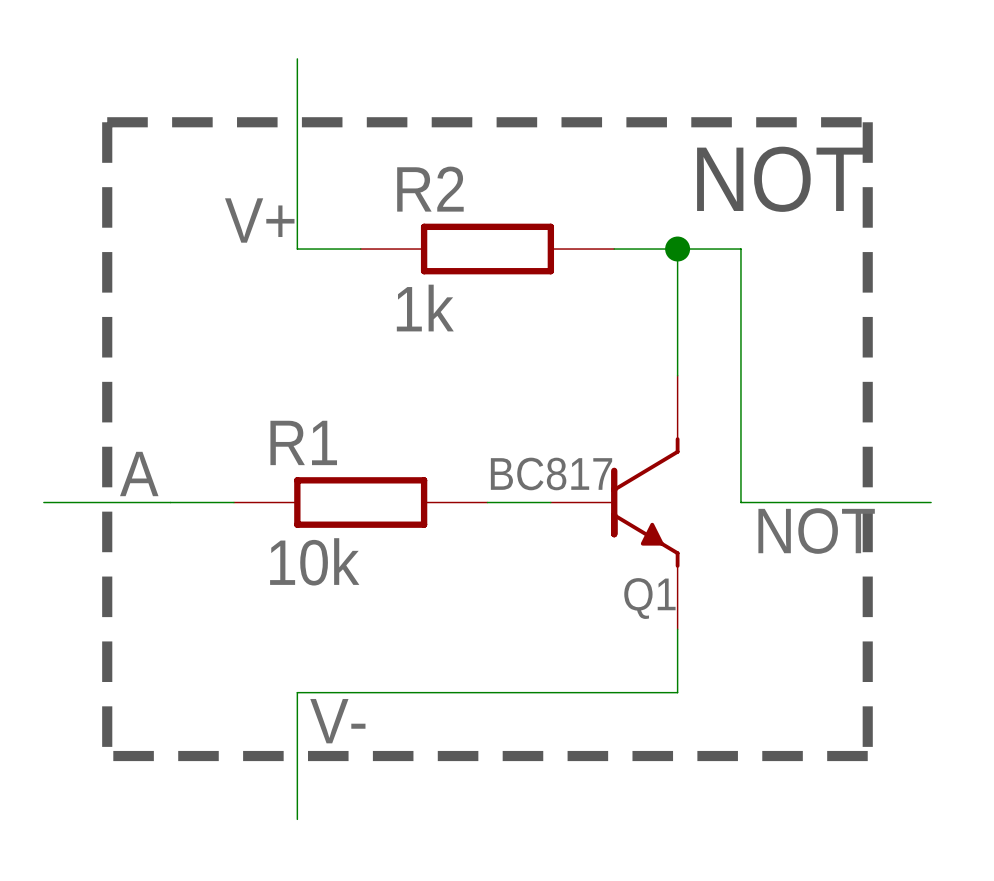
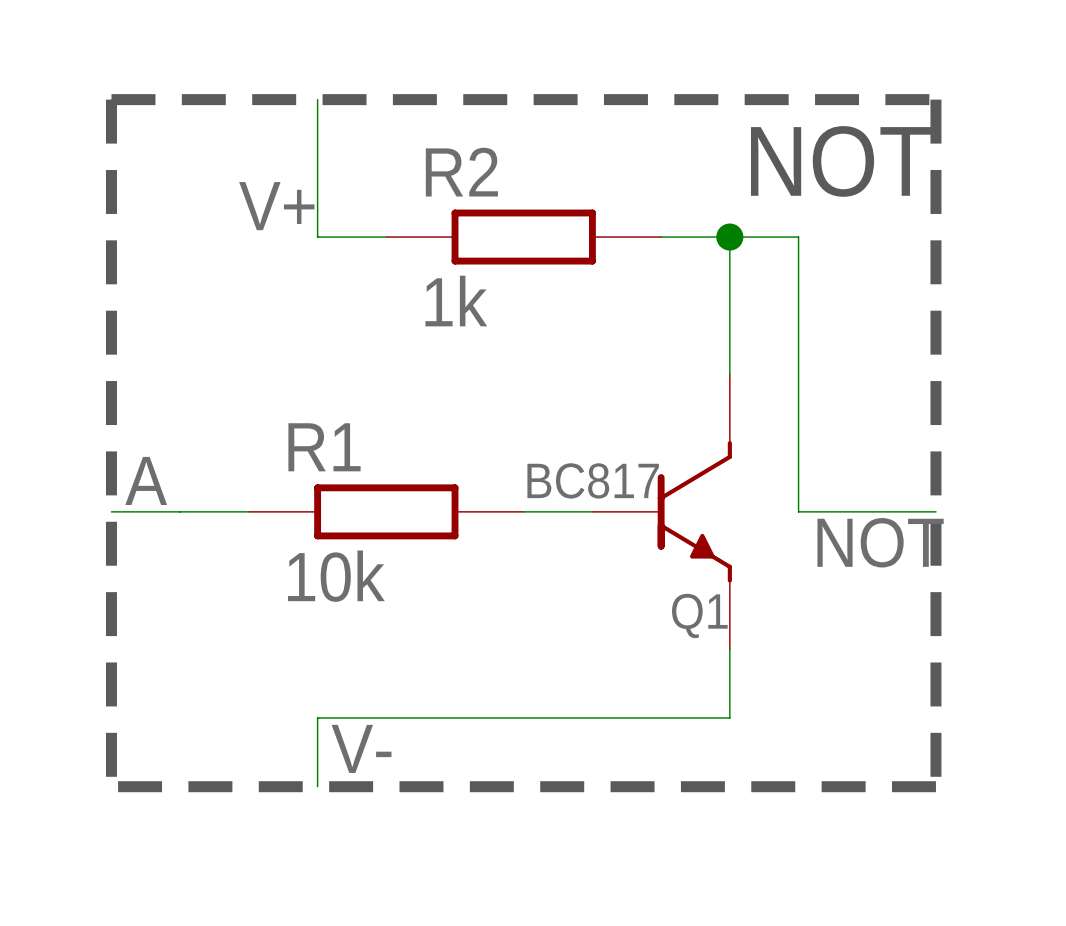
wire: (297, 58) (297, 122) -> none
wire: (43, 502) (107, 502) -> none
wire: (867, 502) (931, 502) -> none
wire: (297, 756) (297, 819) -> none

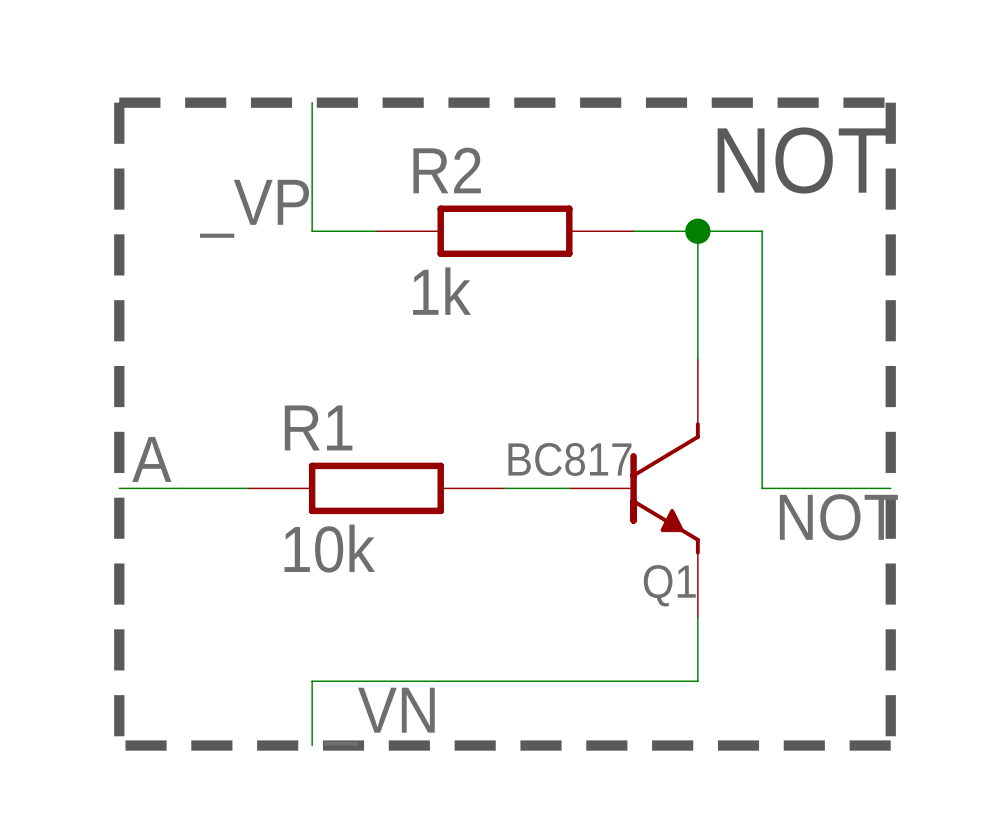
label: V+ (276, 206) -> _VP (254, 208)
label: V- (361, 748) -> _VN (379, 716)

